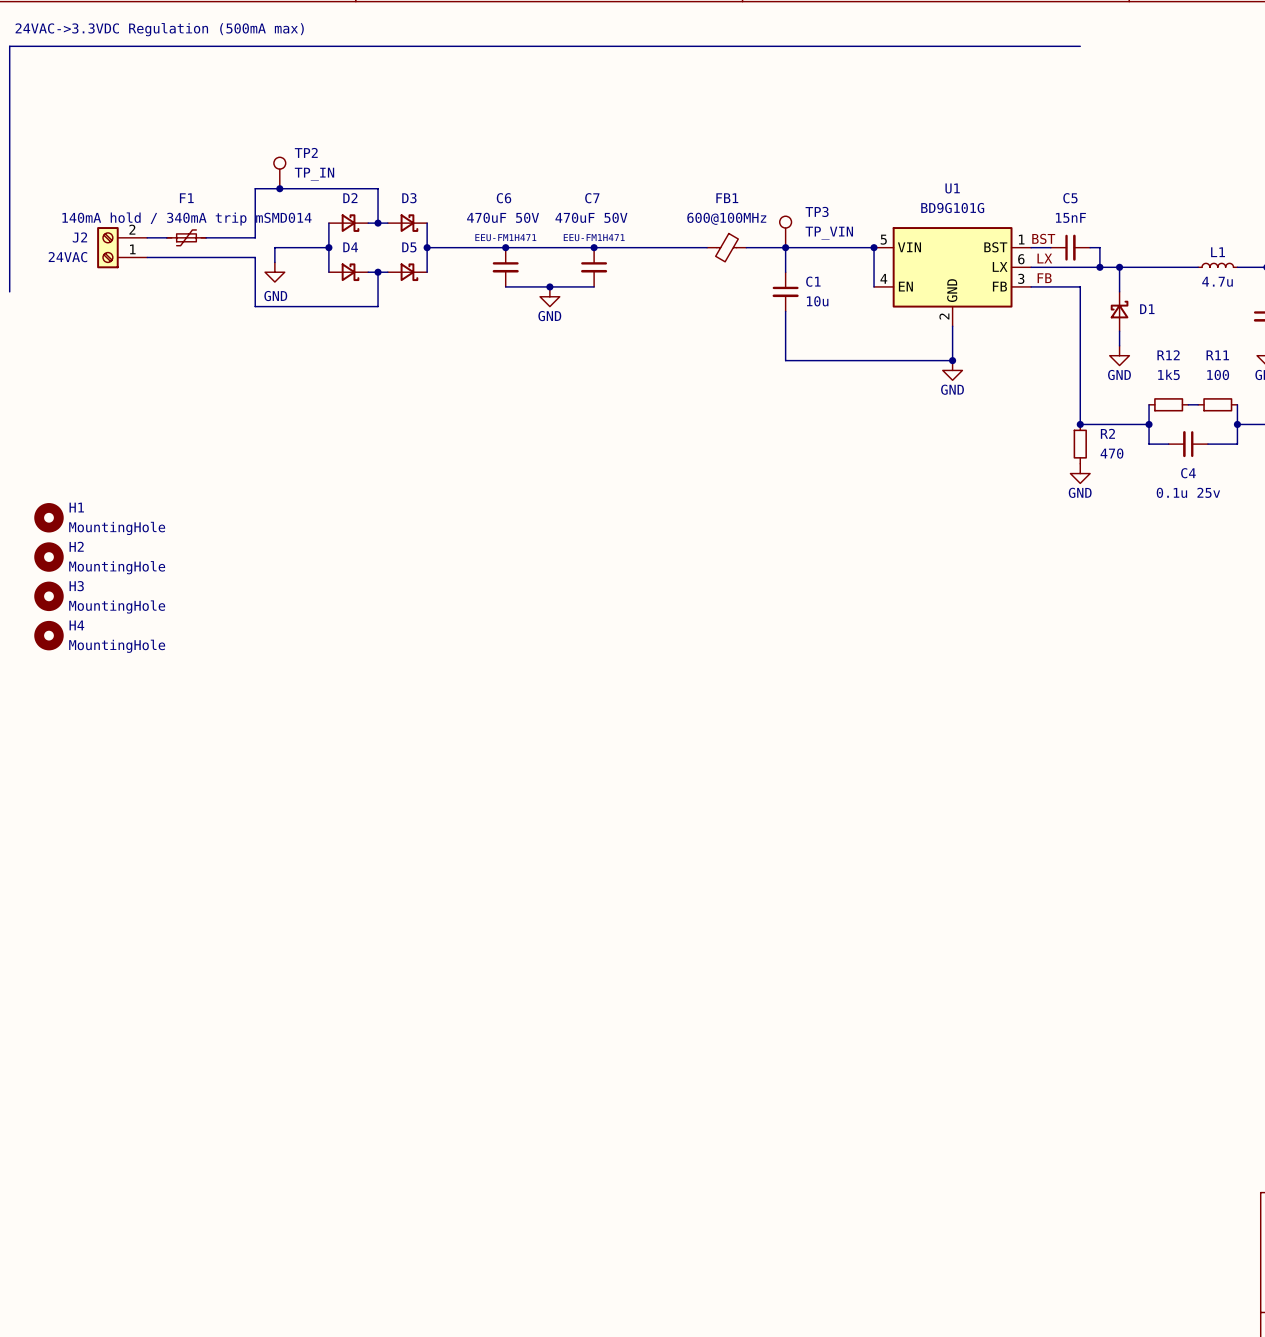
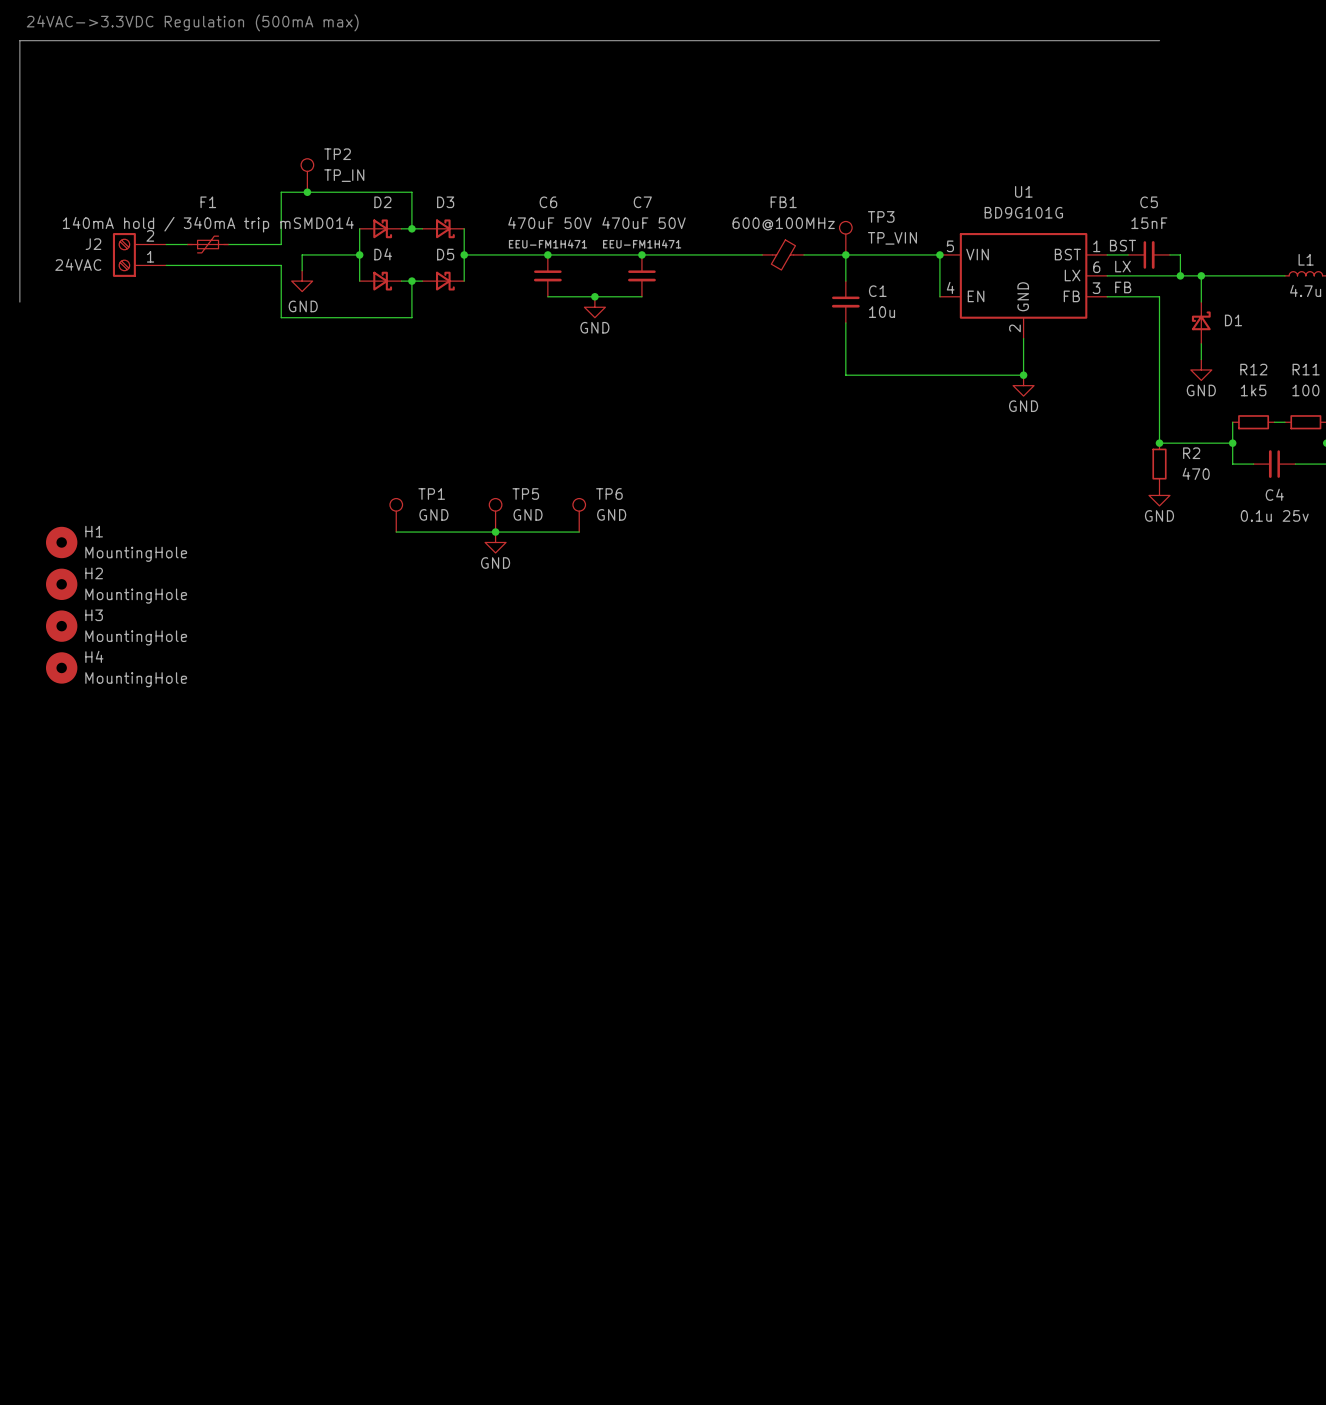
TP1: none -> GND (396, 515)
TP5: none -> GND (495, 515)
TP6: none -> GND (579, 515)
wire: none -> (396, 532) (579, 532)
junction: none -> (495, 532)
power symbol: none -> GND (495, 542)

